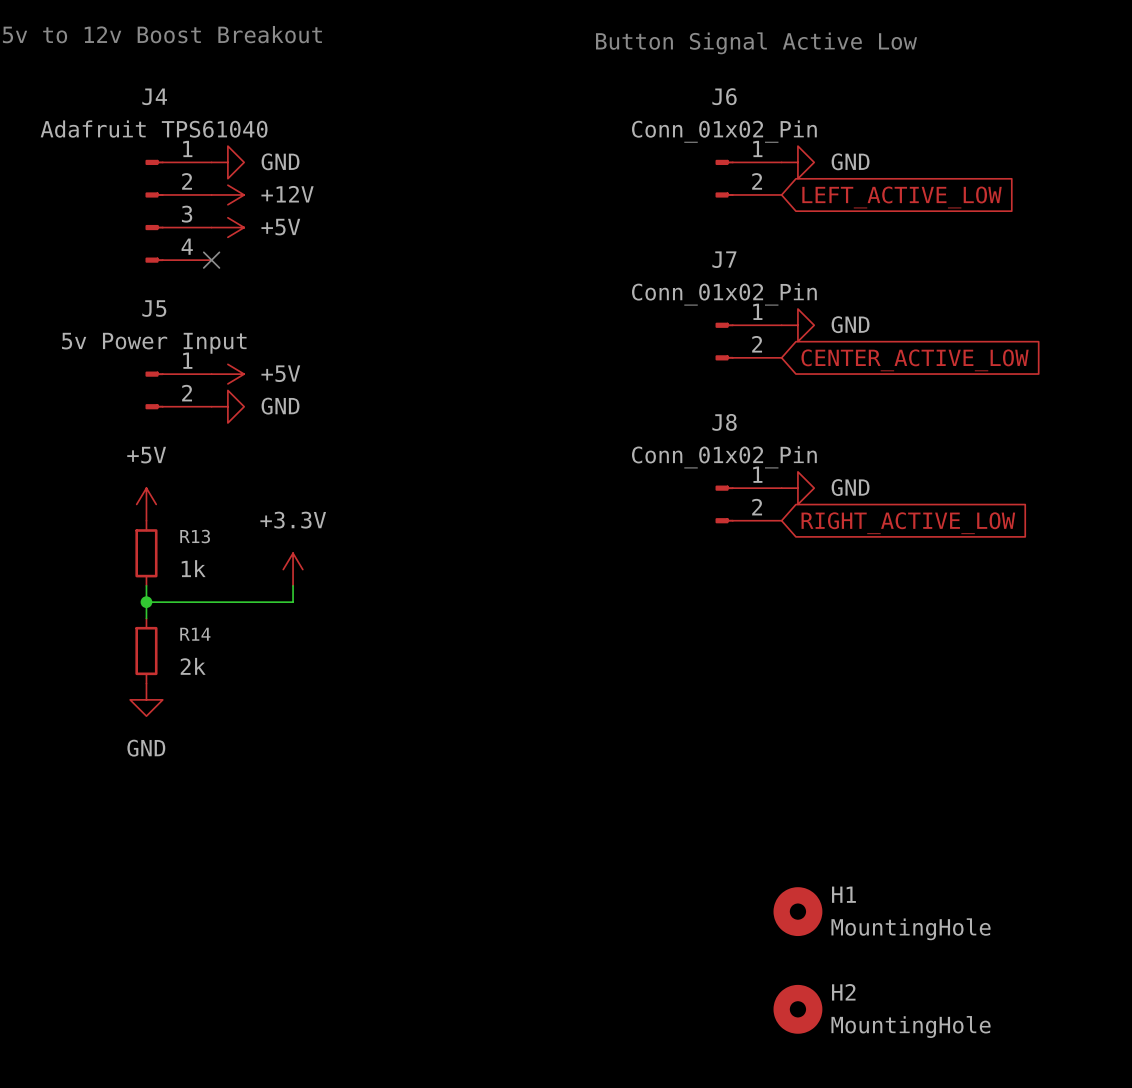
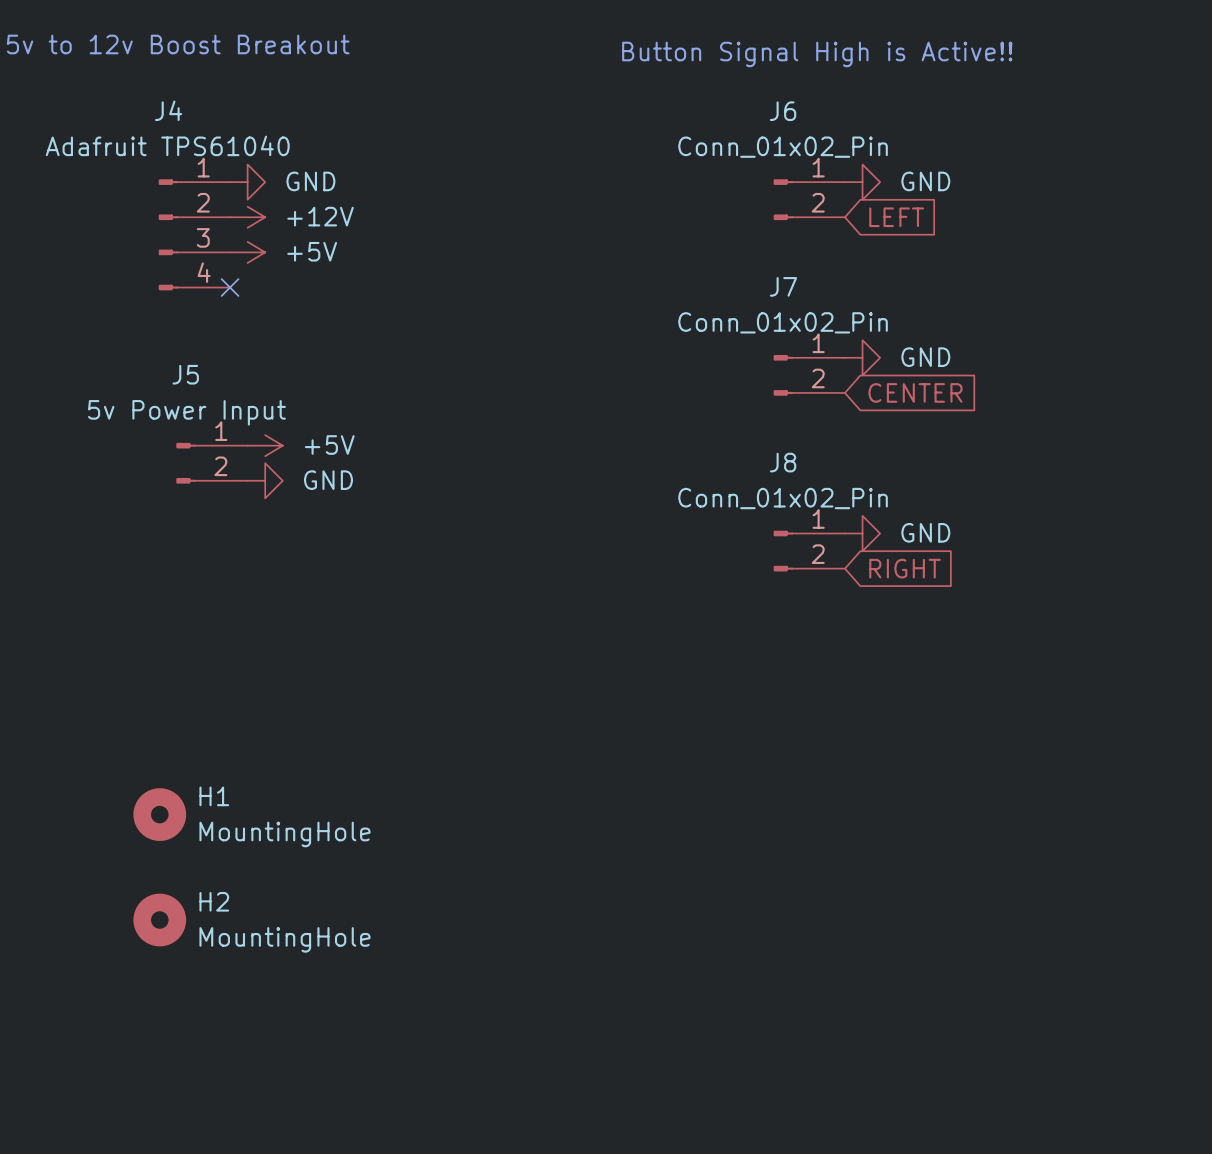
text: Button Signal Active Low (756, 43) -> Button Signal High is Active!! (817, 54)
global label: LEFT_ACTIVE_LOW (902, 197) -> LEFT (896, 217)
global label: CENTER_ACTIVE_LOW (915, 360) -> CENTER (915, 392)
power symbol position: +5V (227, 374) -> +5V (265, 445)
J5 position: (178, 390) -> (211, 463)
power symbol position: GND (227, 406) -> GND (265, 480)
power symbol: +5V (146, 504) -> none
global label: RIGHT_ACTIVE_LOW (908, 523) -> RIGHT (905, 568)
R13: 1k (146, 553) -> none
power symbol: +3.3V (293, 569) -> none
wire: (146, 585) (146, 618) -> none
wire: (293, 585) (293, 602) (146, 602) -> none
junction: (146, 602) -> none
R14: 2k (146, 651) -> none
power symbol: GND (146, 699) -> none
H1 position: (797, 911) -> (159, 814)
H2 position: (797, 1009) -> (159, 920)

